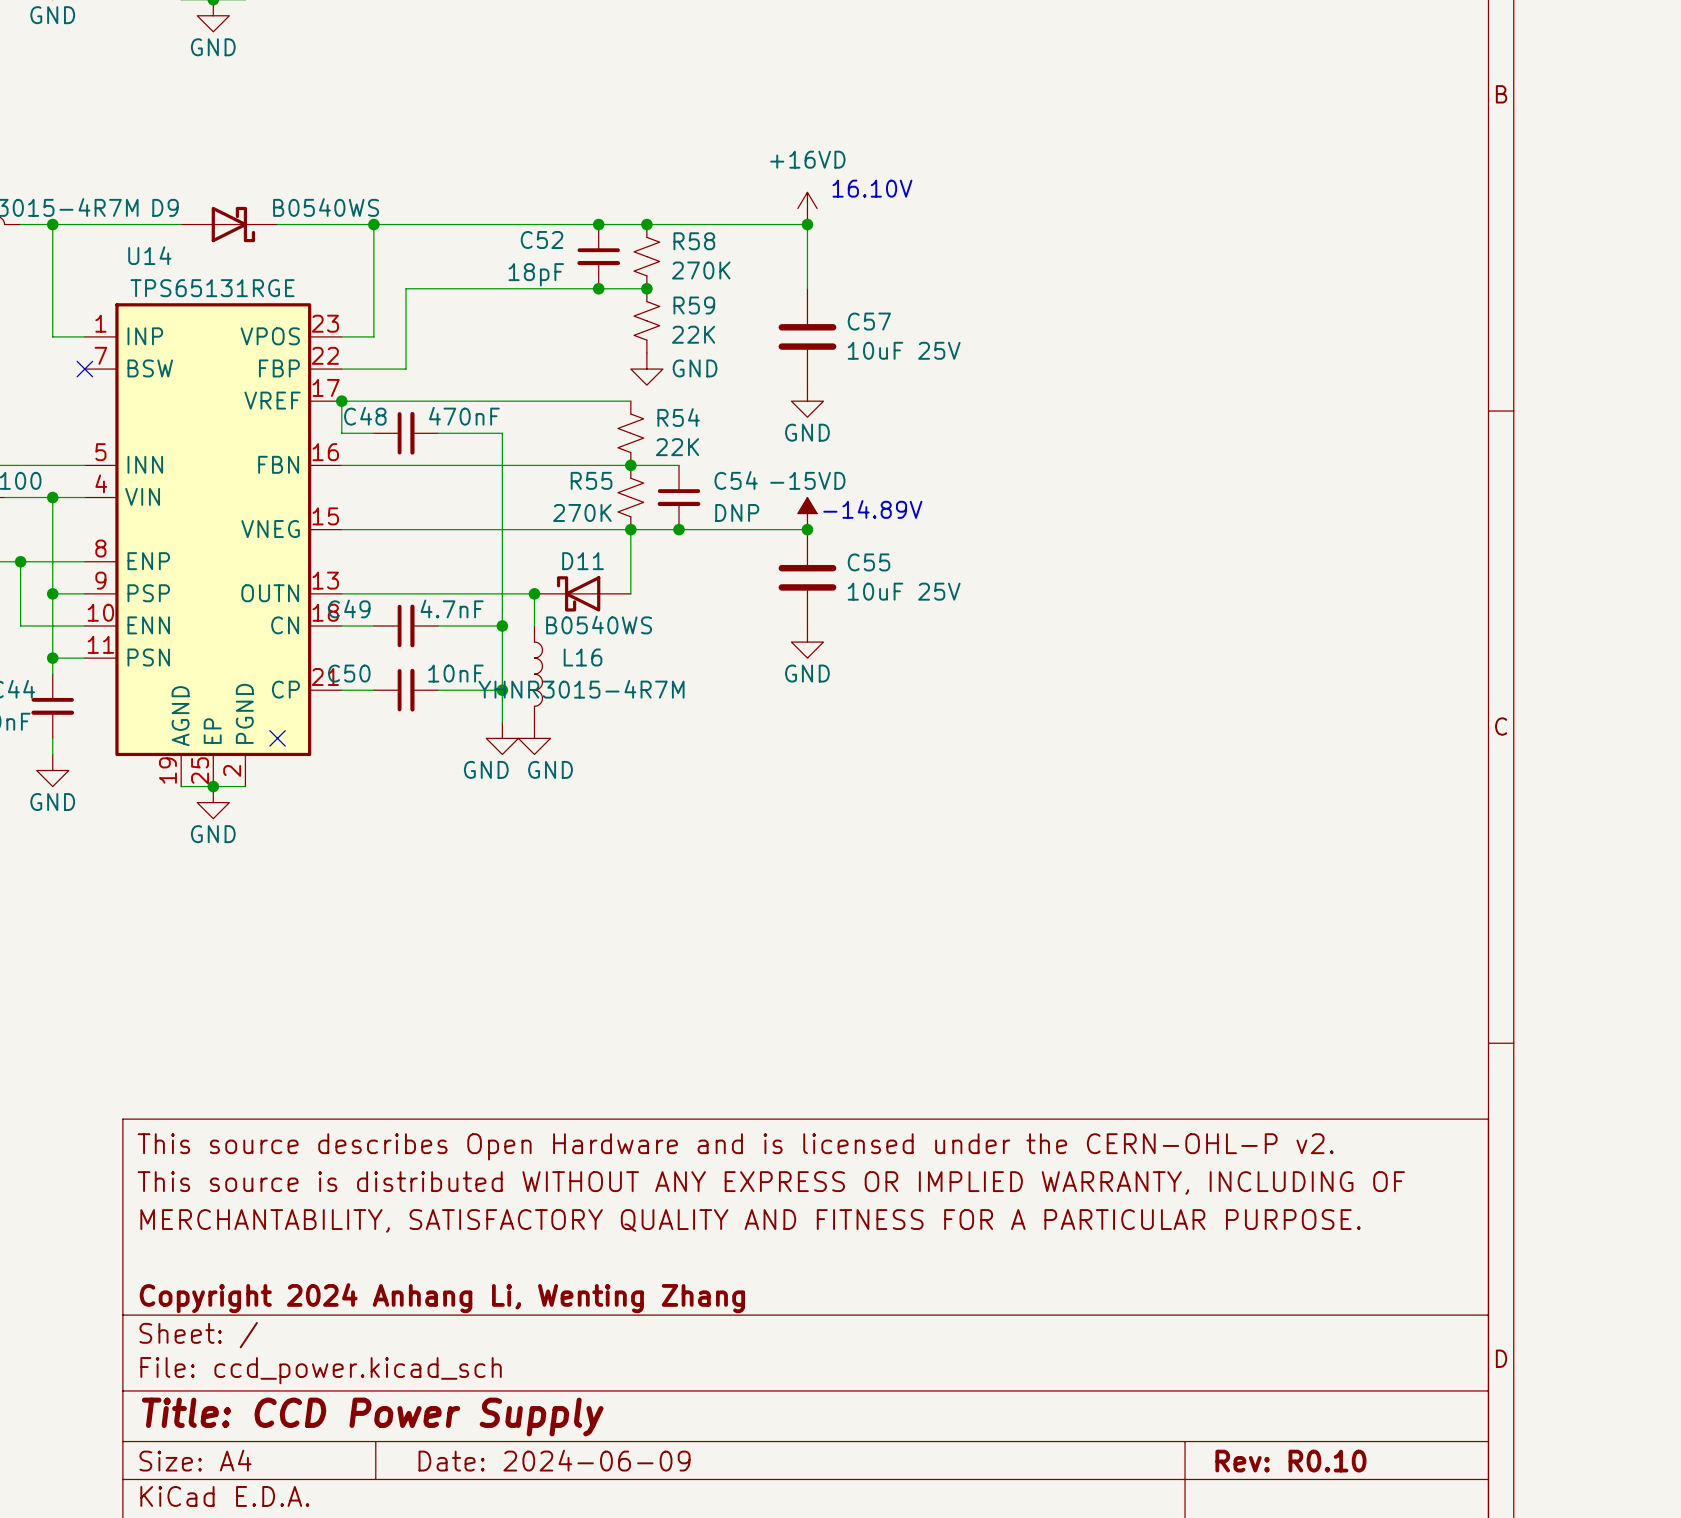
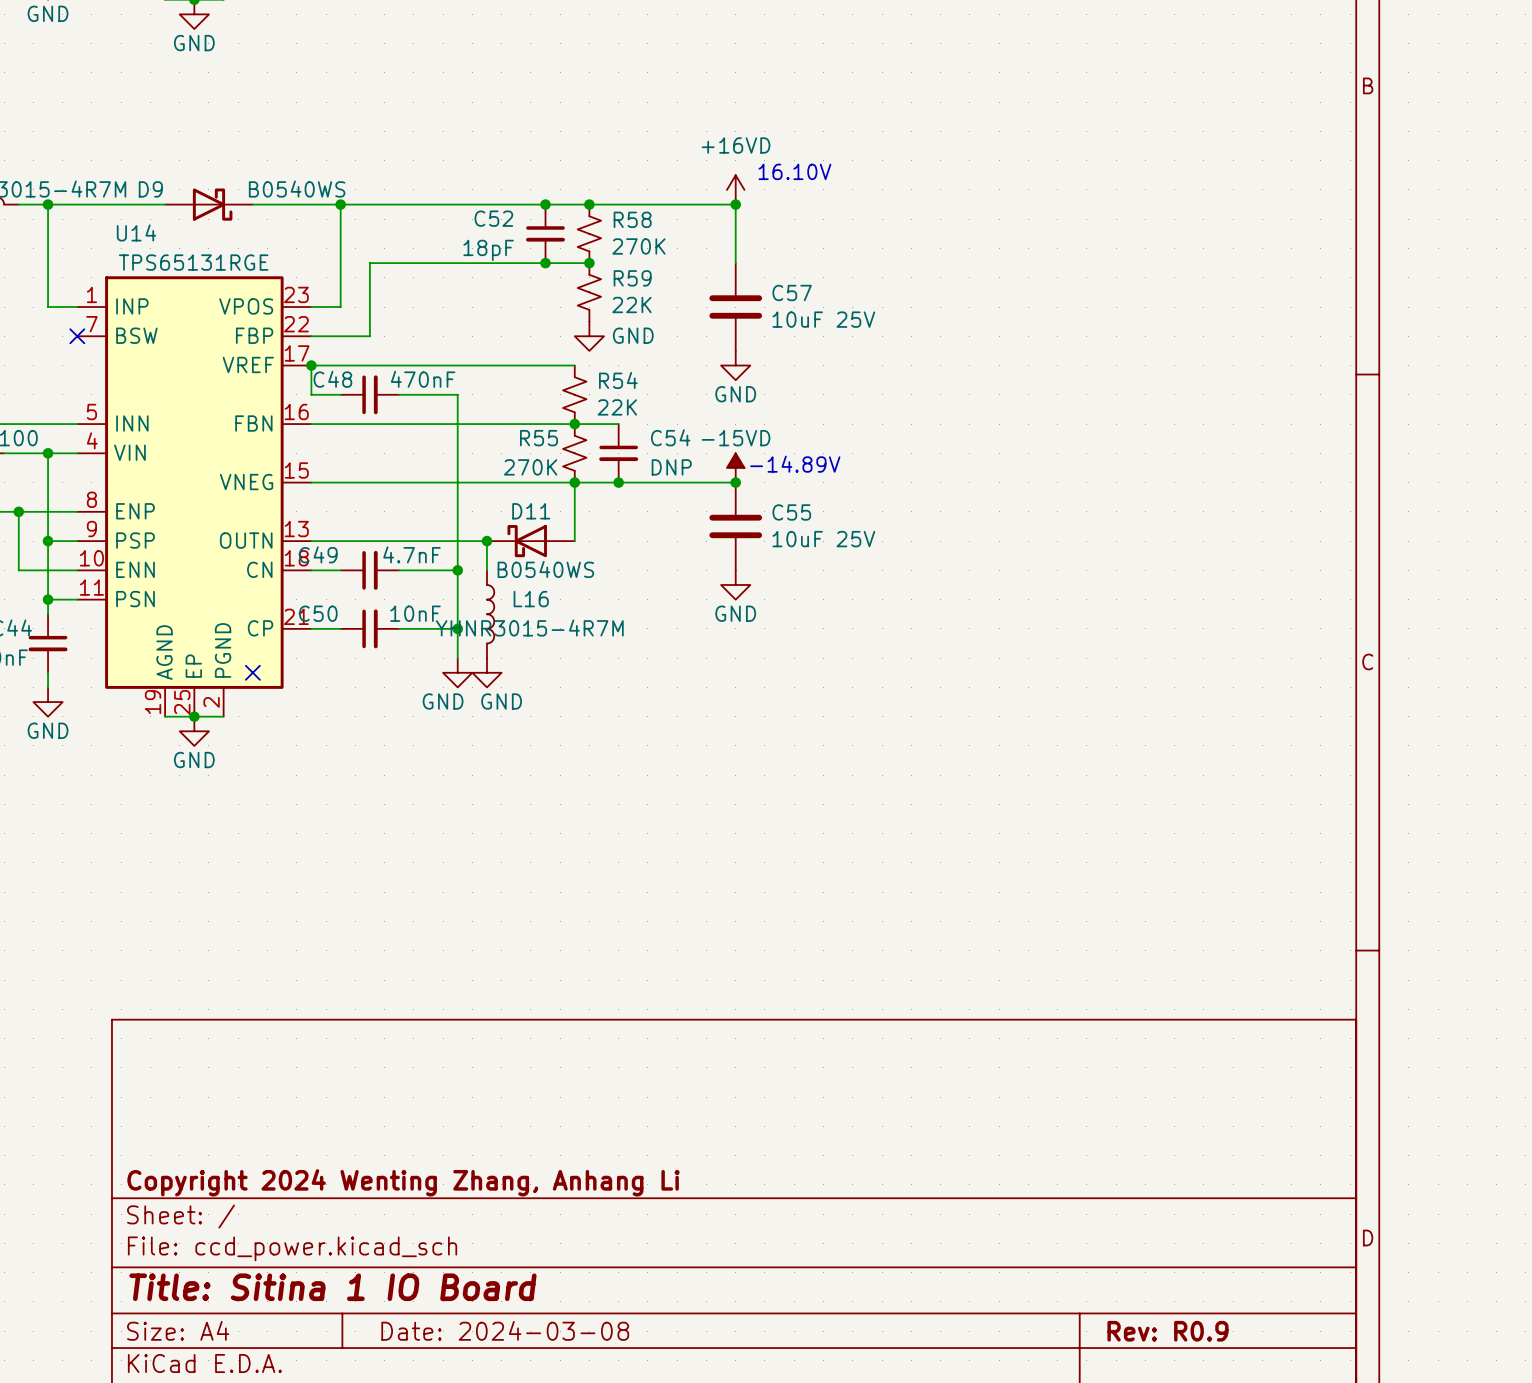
title block: This source describes Open Hardware and is licensed under the CERN-OHL-P v2. (735, 1146) -> none
title block: This source is distributed WITHOUT ANY EXPRESS OR IMPLIED WARRANTY, INCLUDING OF (771, 1182) -> none
title block: MERCHANTABILITY, SATISFACTORY QUALITY AND FITNESS FOR A PARTICULAR PURPOSE. (750, 1220) -> none
title block: Copyright 2024 Anhang Li, Wenting Zhang (442, 1298) -> Copyright 2024 Wenting Zhang, Anhang Li (403, 1182)
title block: Title: CCD Power Supply (372, 1416) -> Title: Sitina 1 IO Board (332, 1287)
title block: Date: 2024-06-09 (554, 1460) -> Date: 2024-03-08 (505, 1330)
title block: Rev: R0.10 (1290, 1461) -> Rev: R0.9 (1167, 1331)

